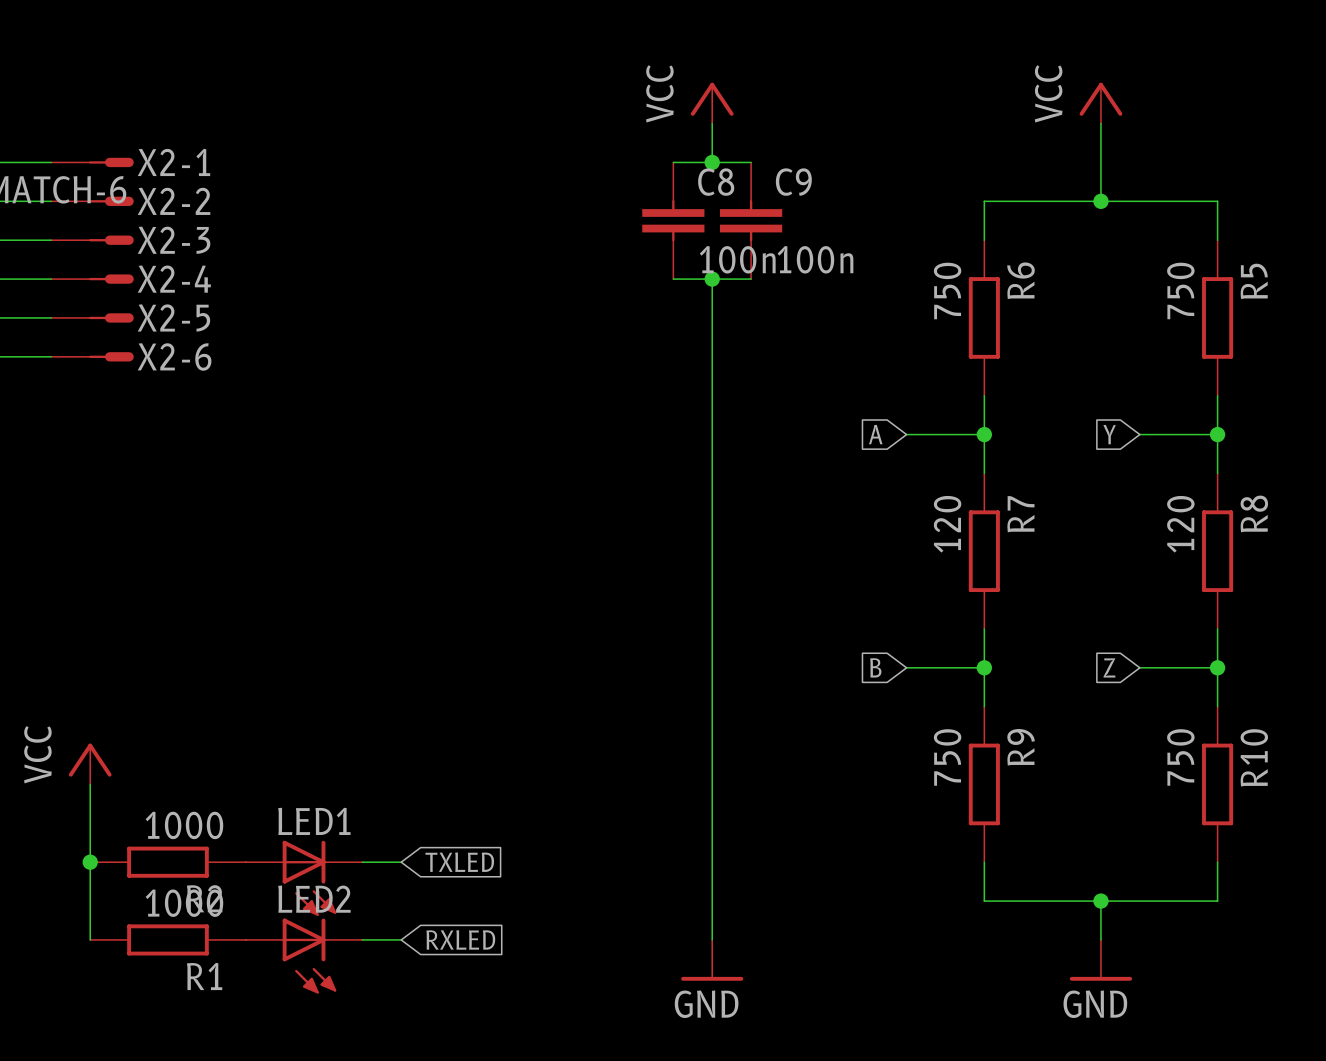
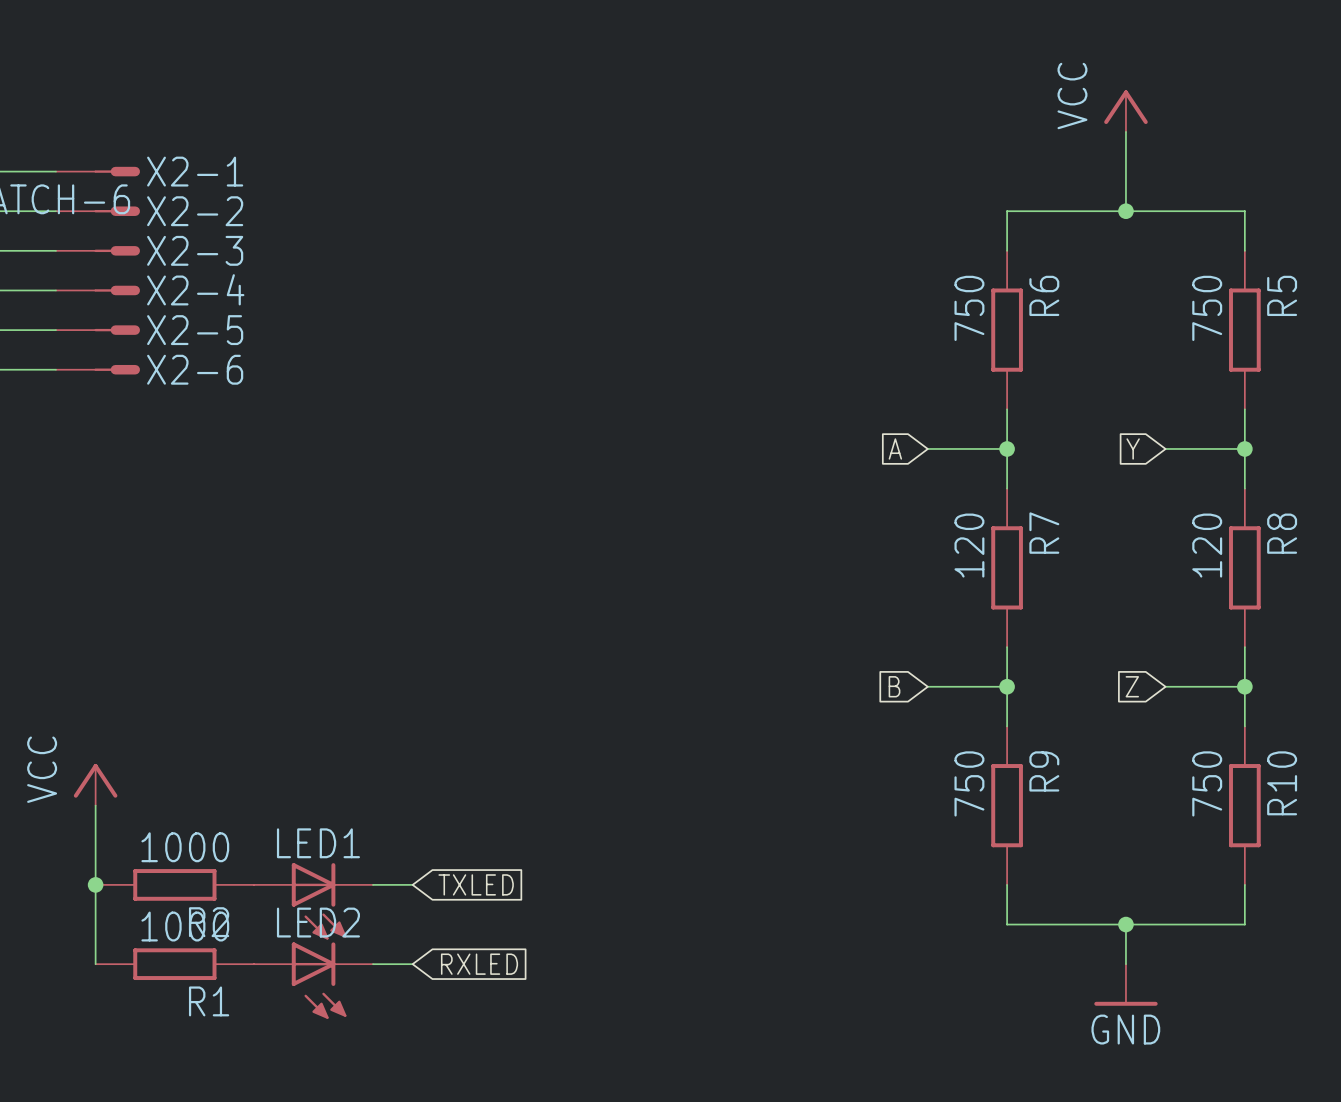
power symbol: VCC (712, 103) -> none
wire: (712, 123) (712, 162) -> none
wire: (673, 162) (751, 162) -> none
junction: (712, 162) -> none
C8: 100n (673, 220) -> none
C9: 100n (751, 220) -> none
wire: (673, 279) (751, 279) -> none
wire: (712, 279) (712, 939) -> none
junction: (712, 279) -> none
power symbol: GND (712, 960) -> none

